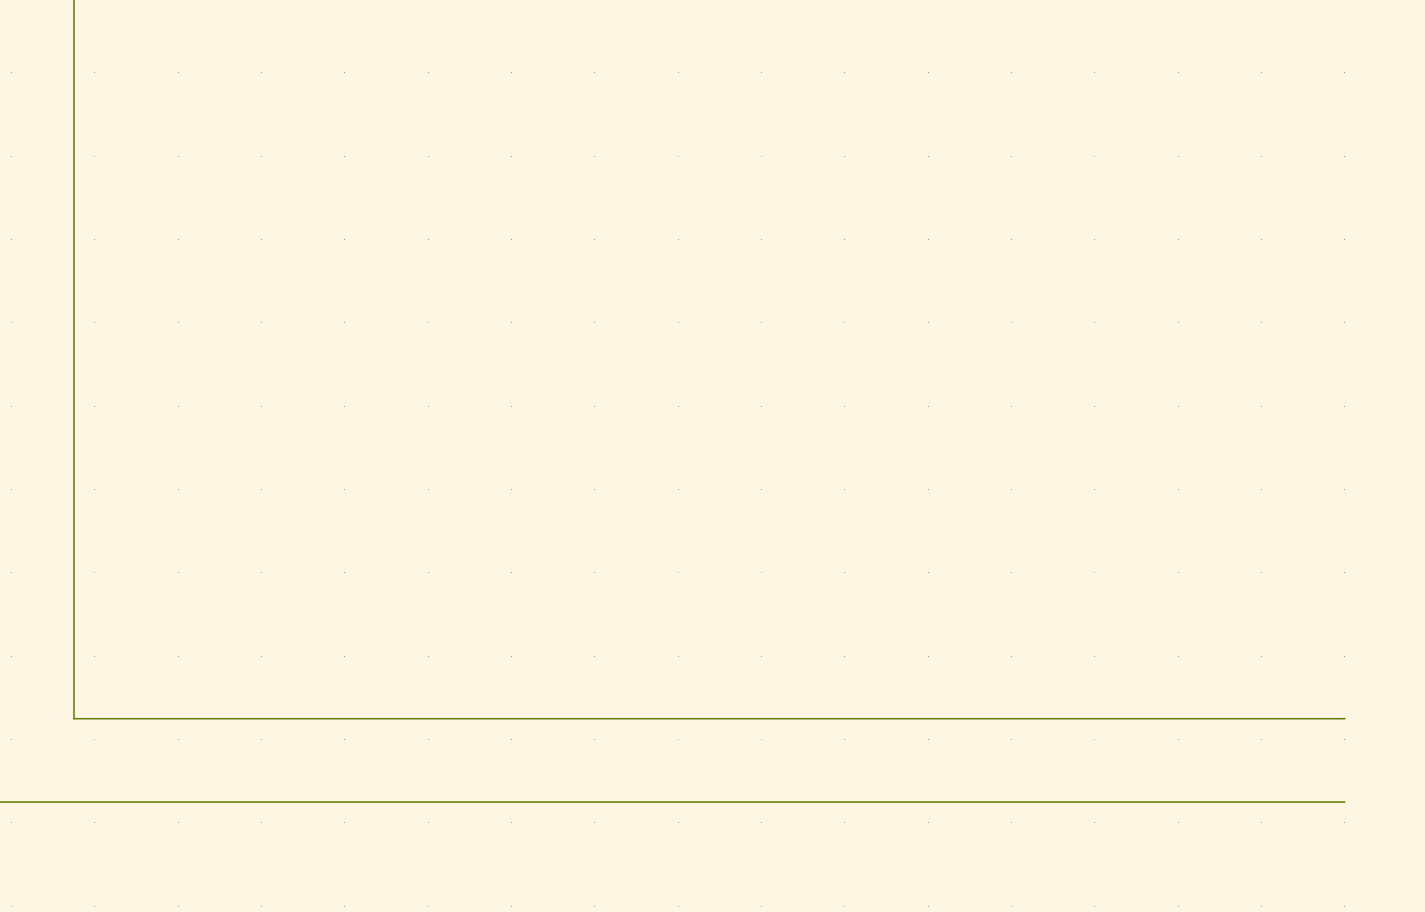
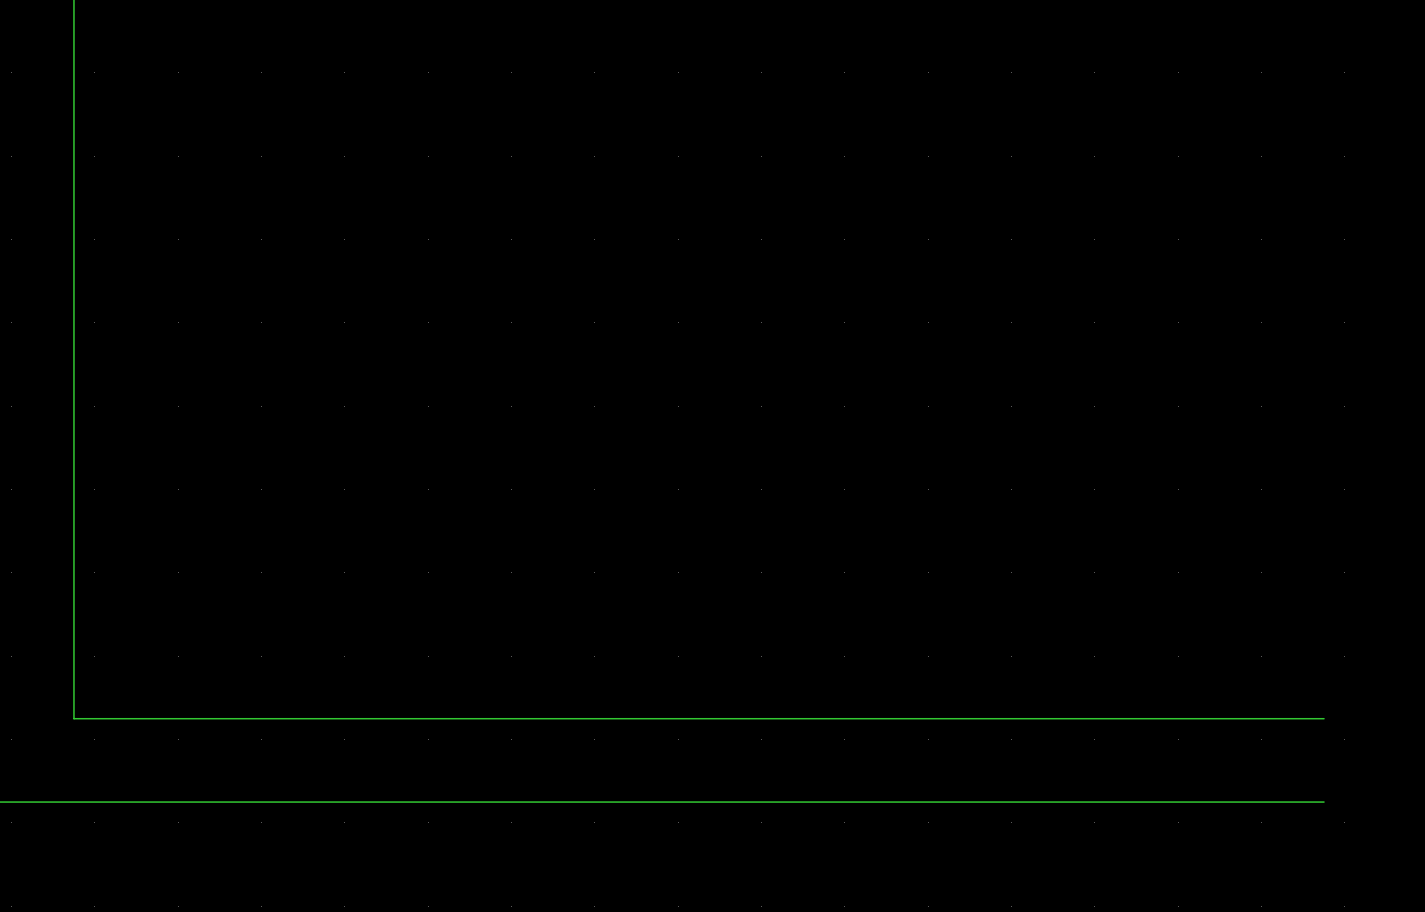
wire: (1324, 718) (1344, 718) -> none
wire: (1324, 802) (1344, 802) -> none

